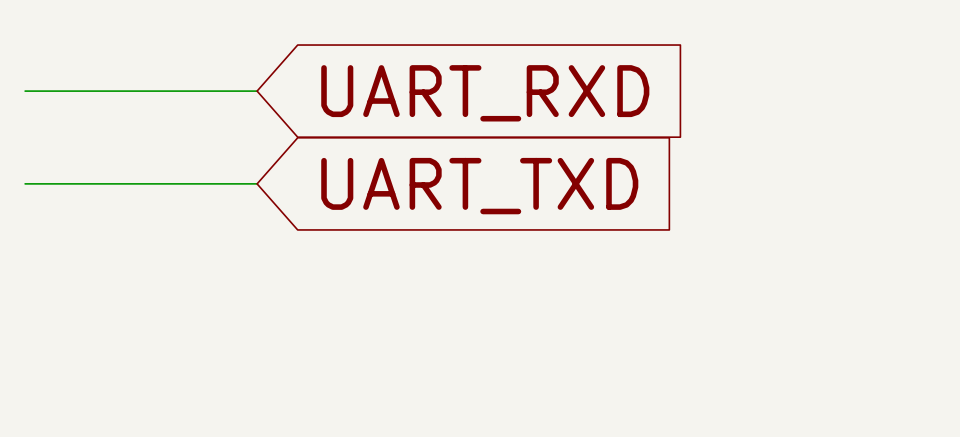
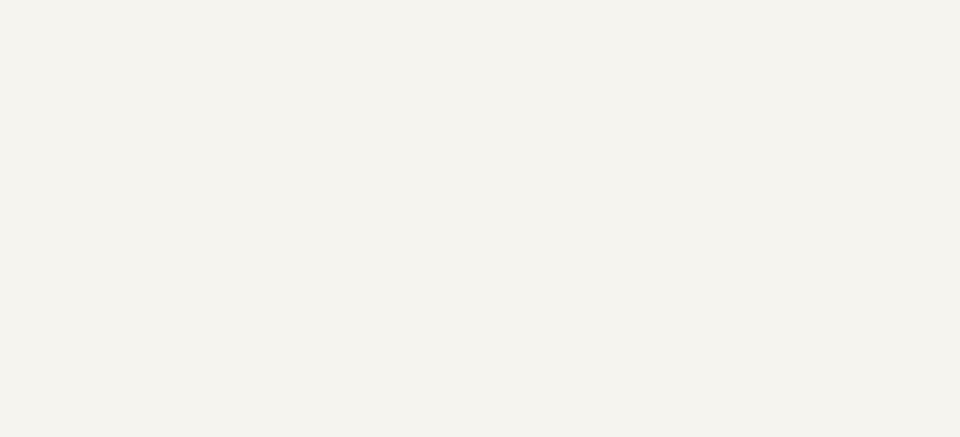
wire: (25, 91) (257, 91) -> none
global label: UART_RXD (485, 93) -> none
wire: (25, 183) (257, 183) -> none
global label: UART_TXD (479, 186) -> none

